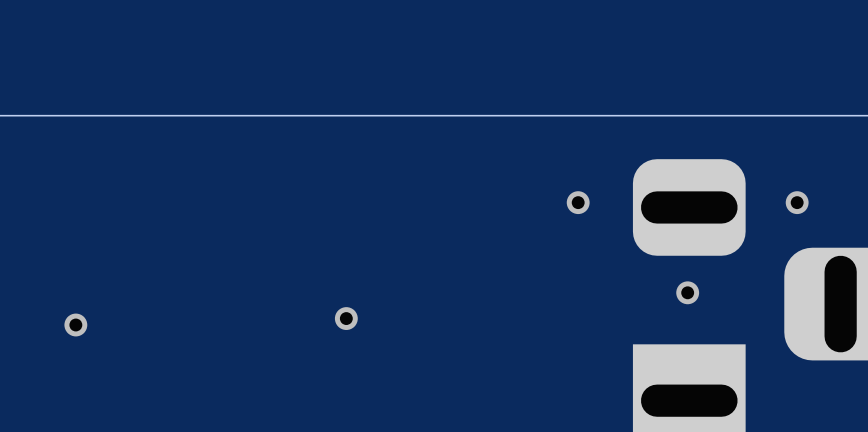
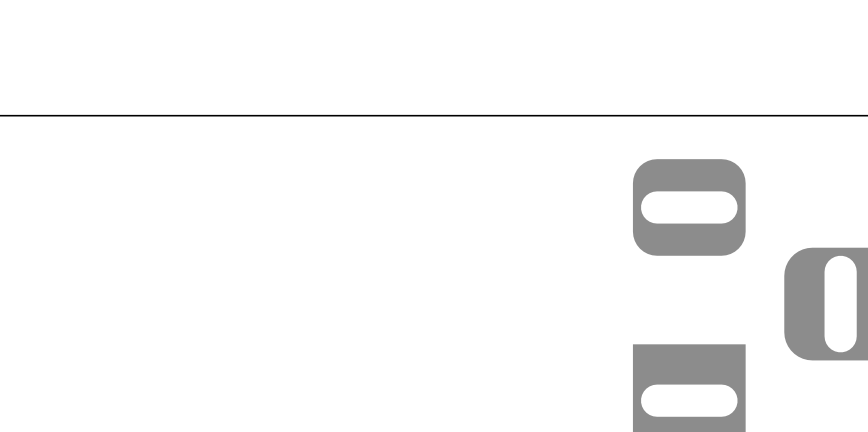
via: (578, 202) -> none
via: (797, 202) -> none
via: (687, 292) -> none
via: (346, 318) -> none
via: (75, 325) -> none

